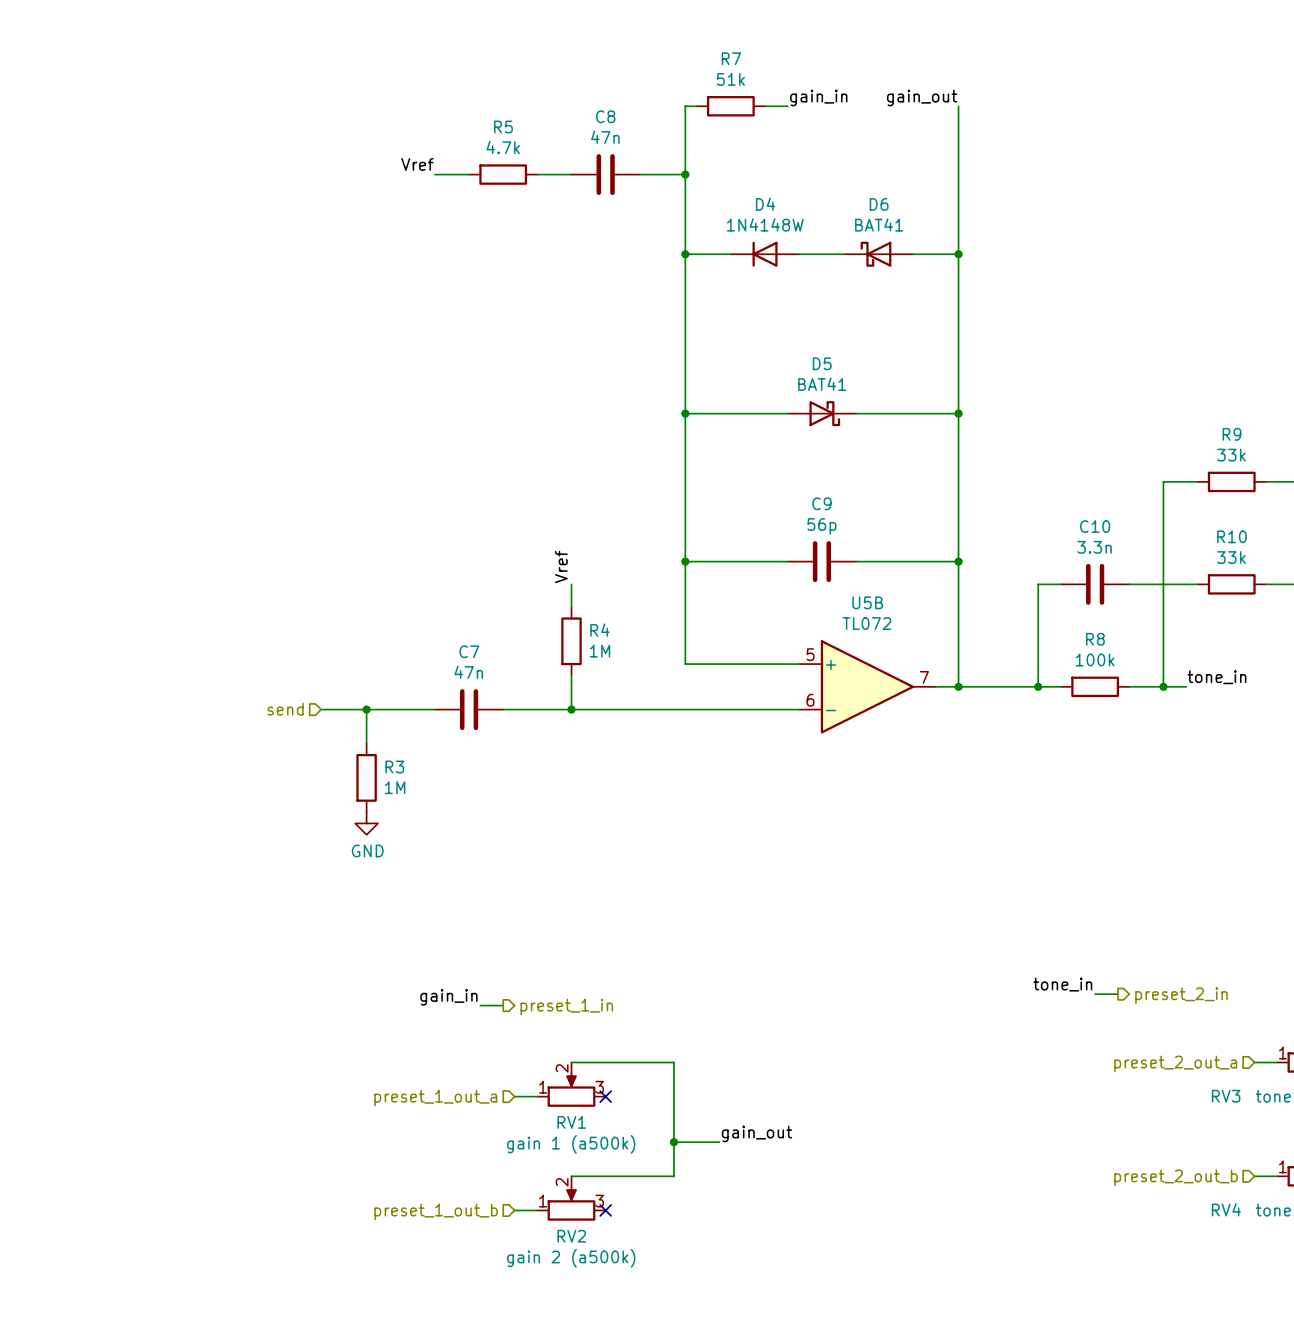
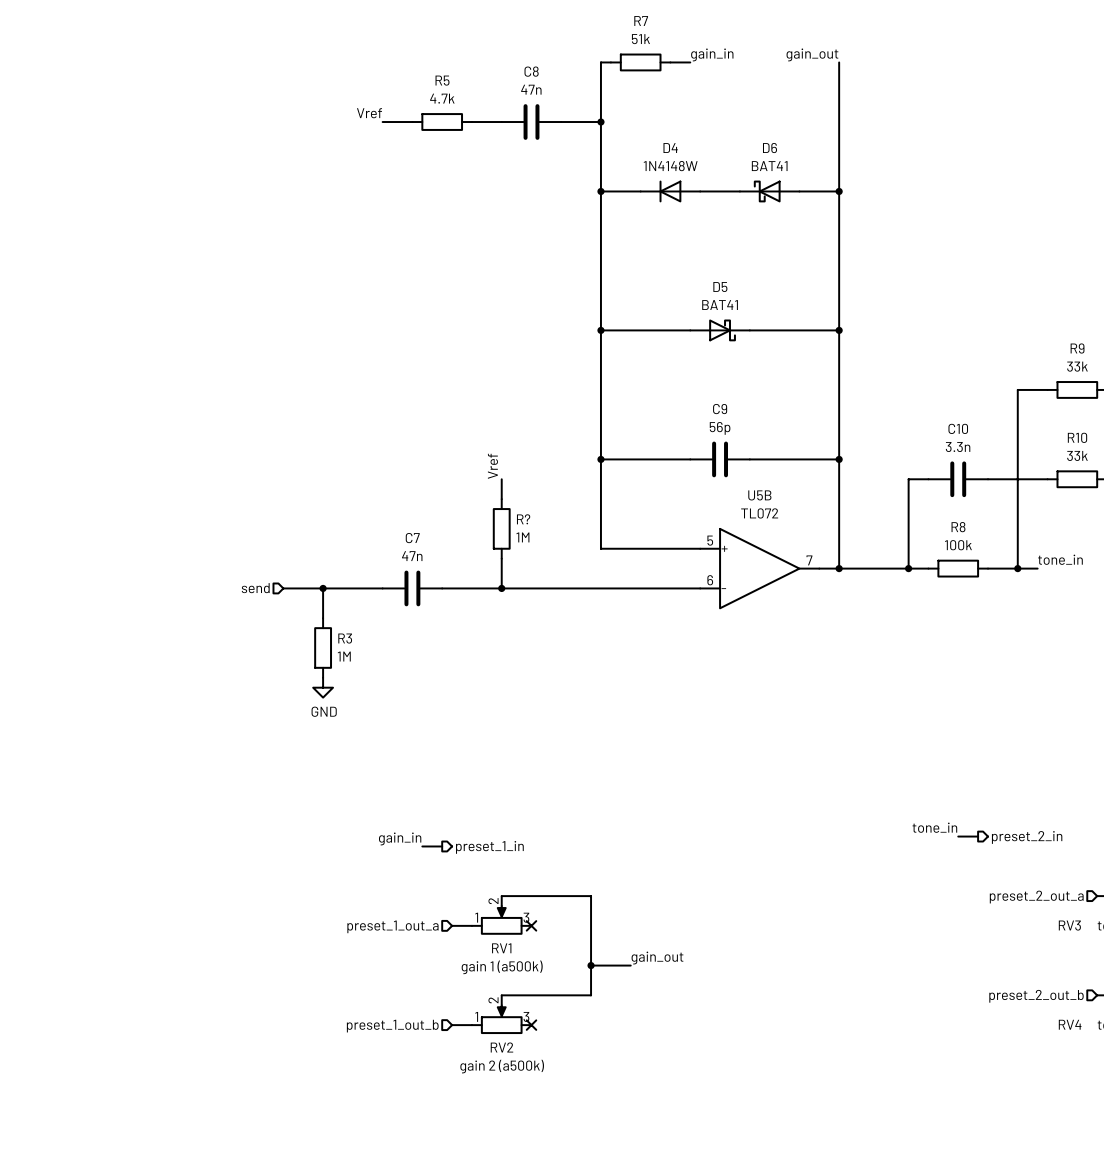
R4 name: R4 (599, 630) -> R? (523, 519)

